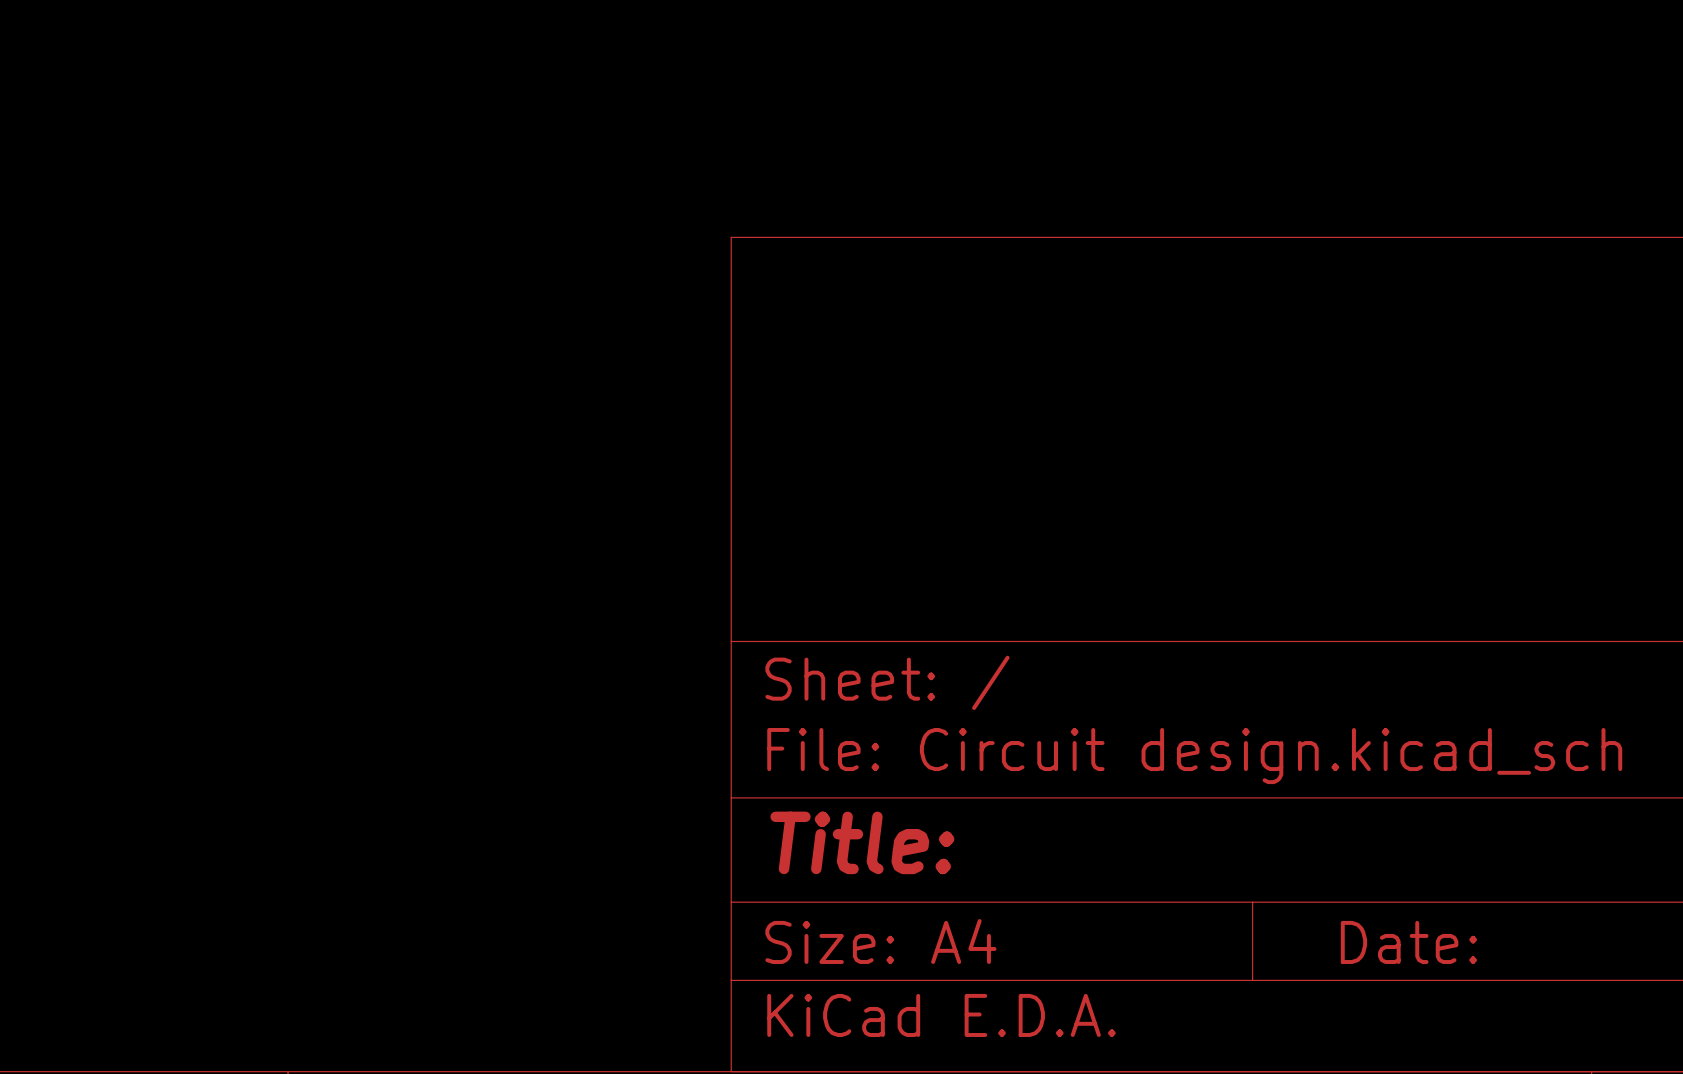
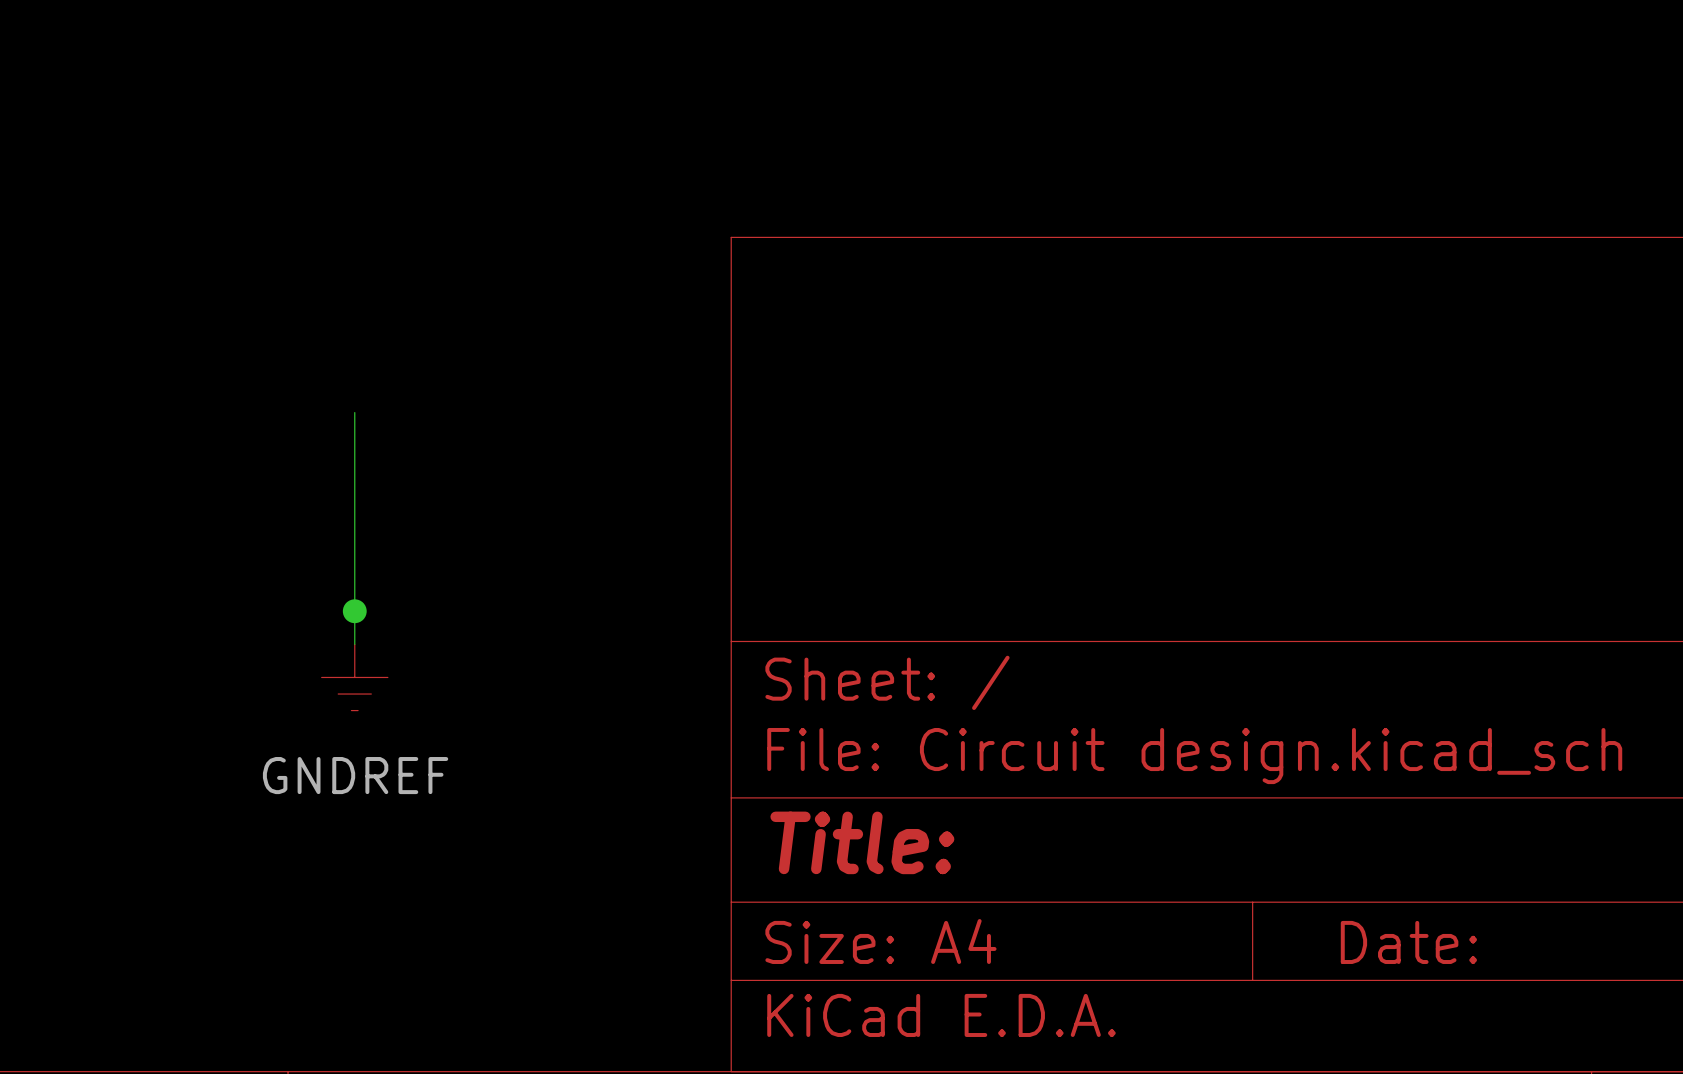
wire: none -> (354, 412) (354, 644)
junction: none -> (354, 611)
power symbol: none -> GNDREF (354, 677)

